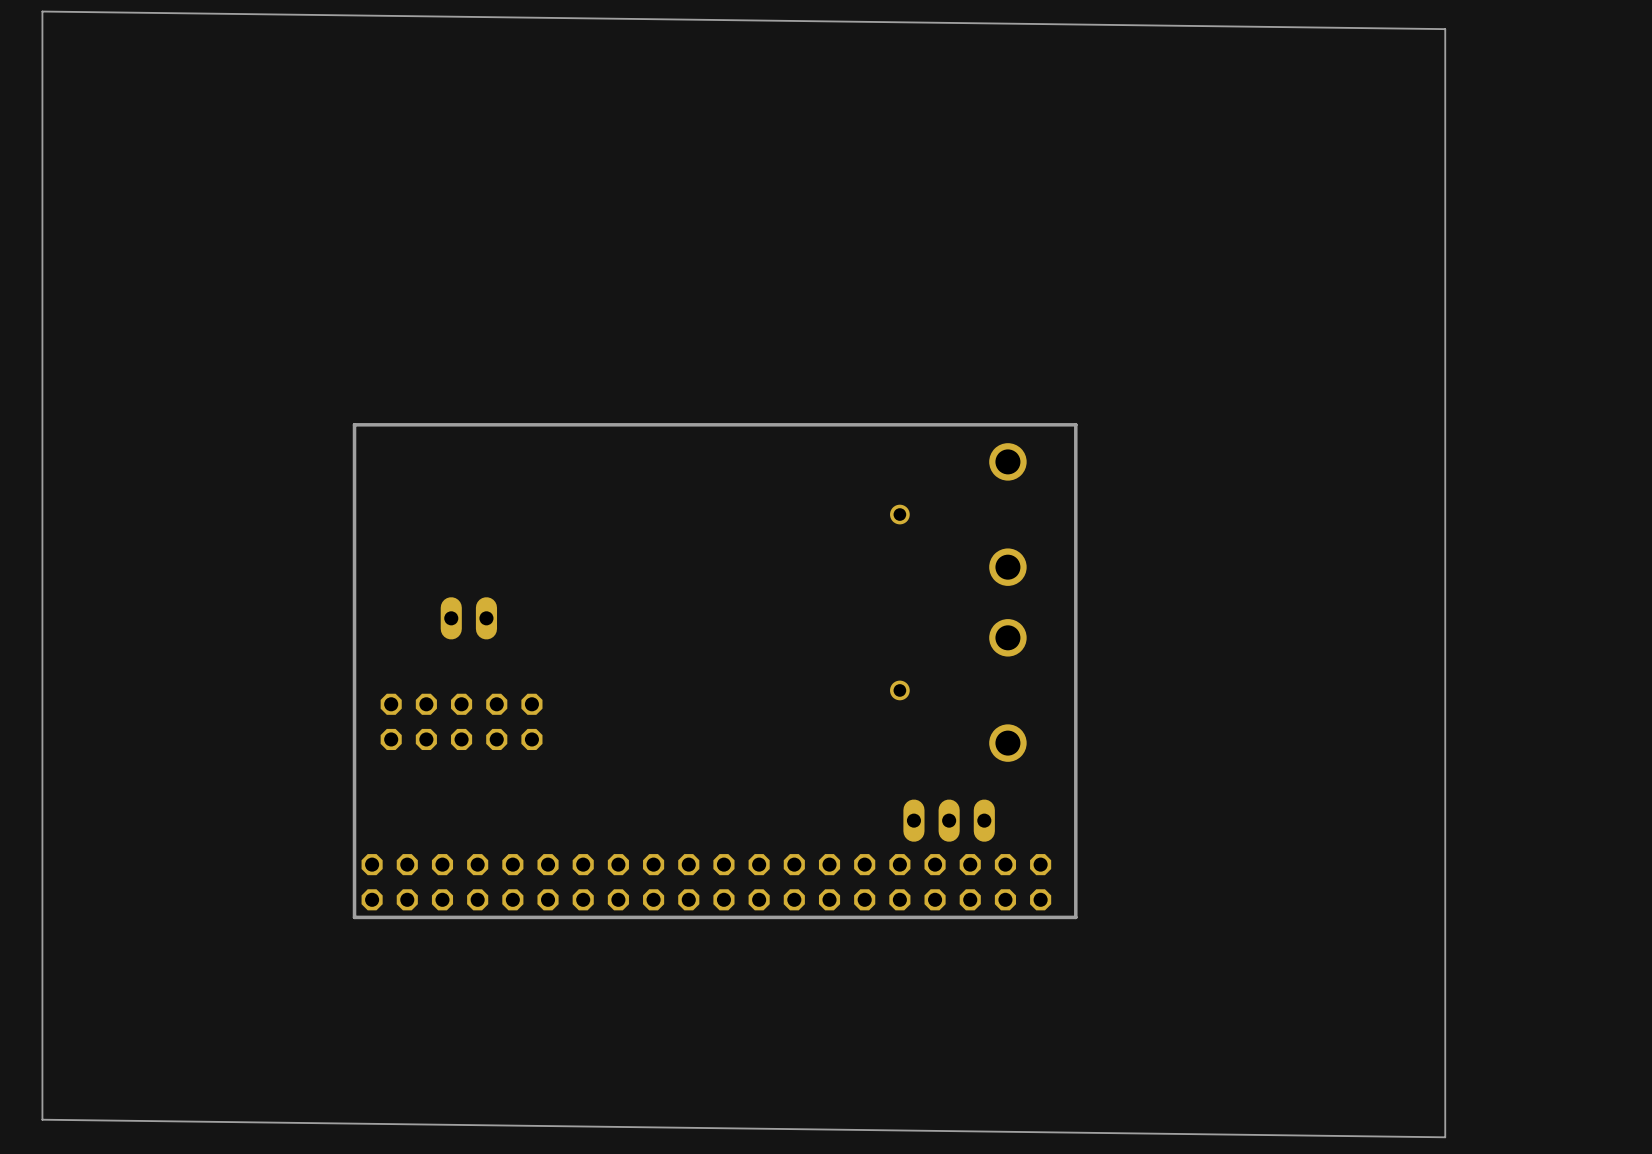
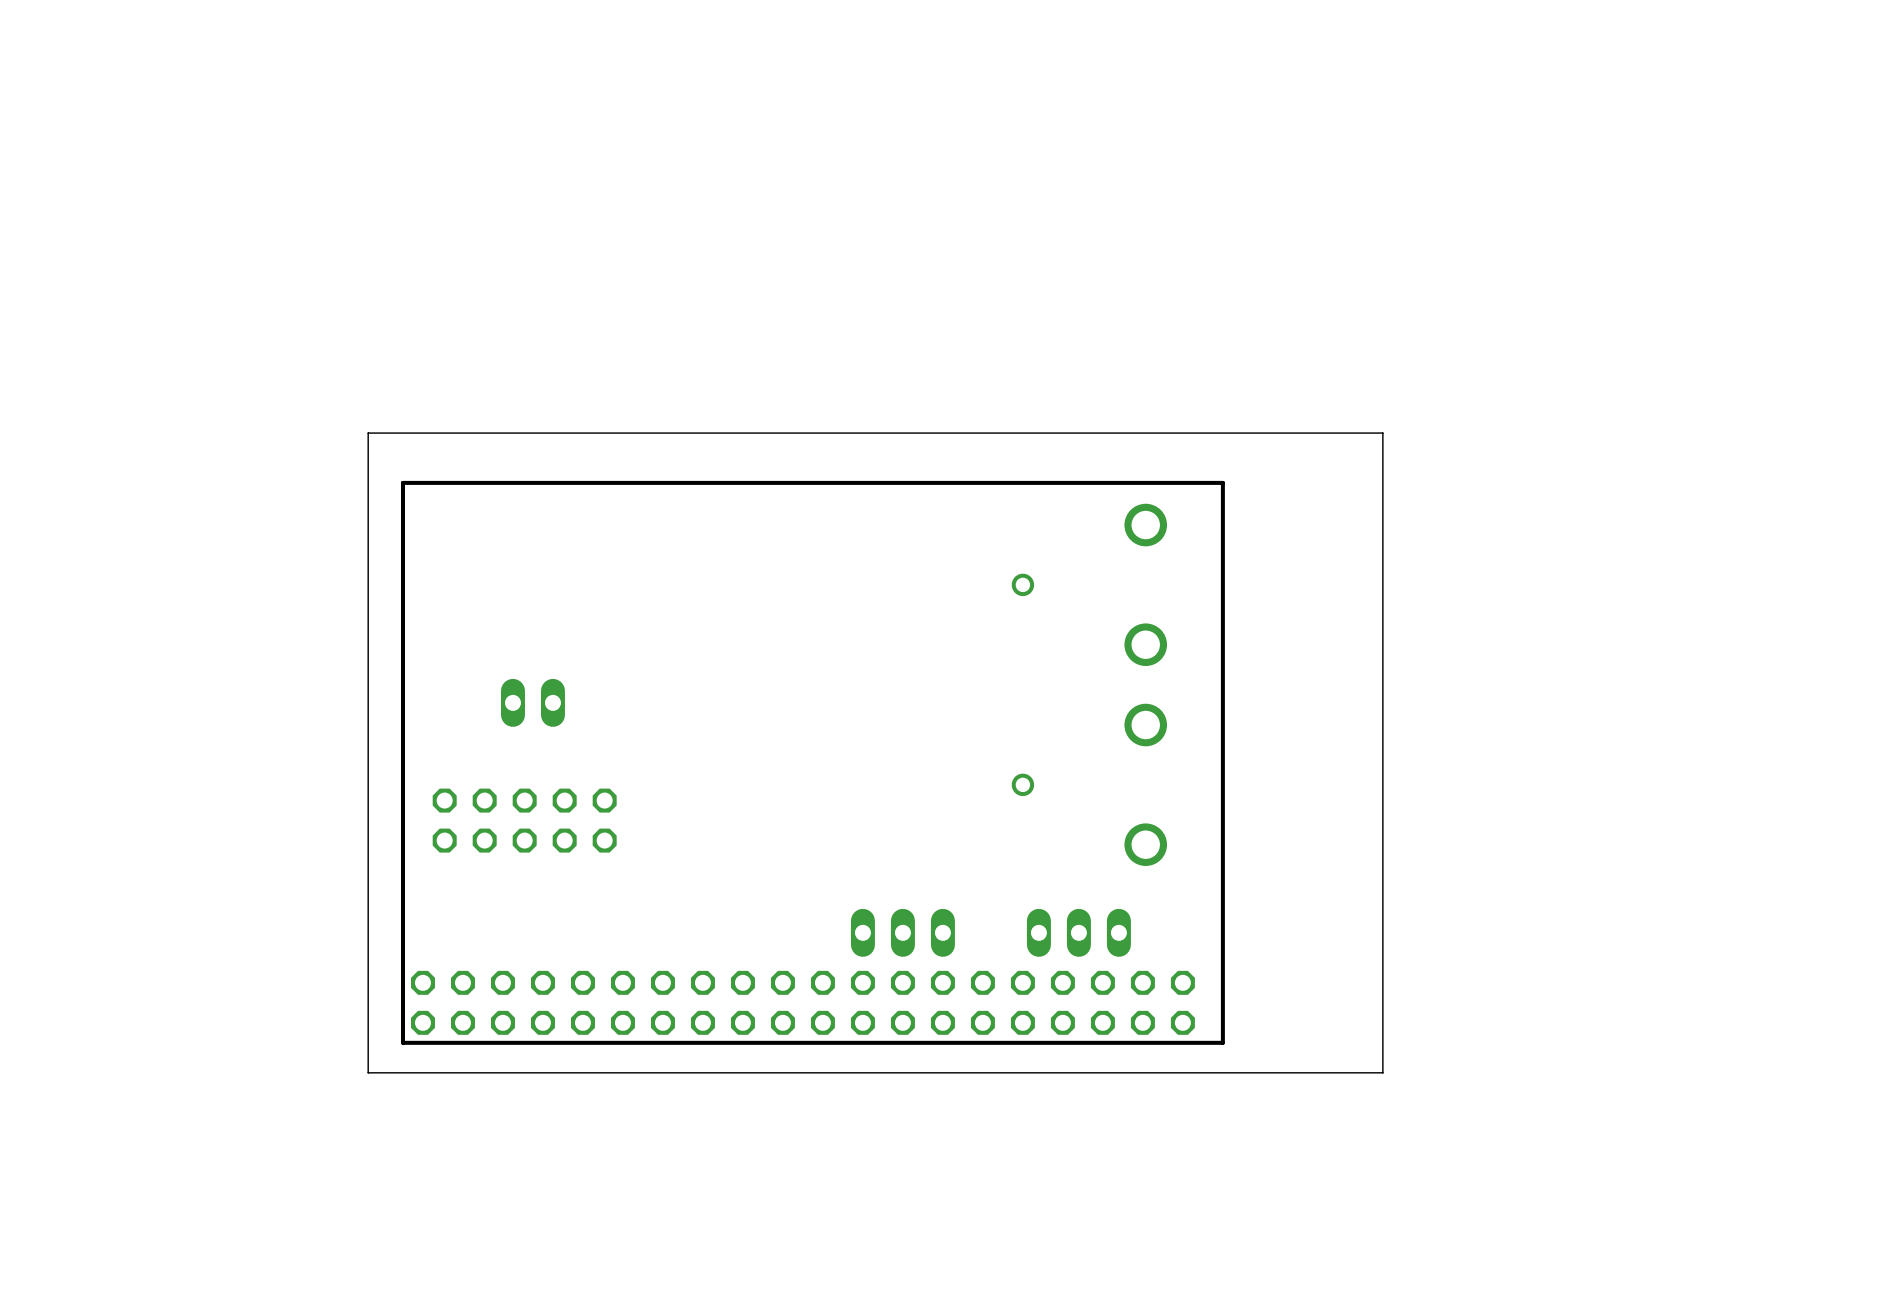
board edge: (42, 11) (42, 1119) (1445, 1137) (1445, 29) (42, 11) -> none
board edge: none -> (1382, 433) (368, 433) (368, 1072) (1382, 1072) (1382, 433)
part: none -> (902, 932)

